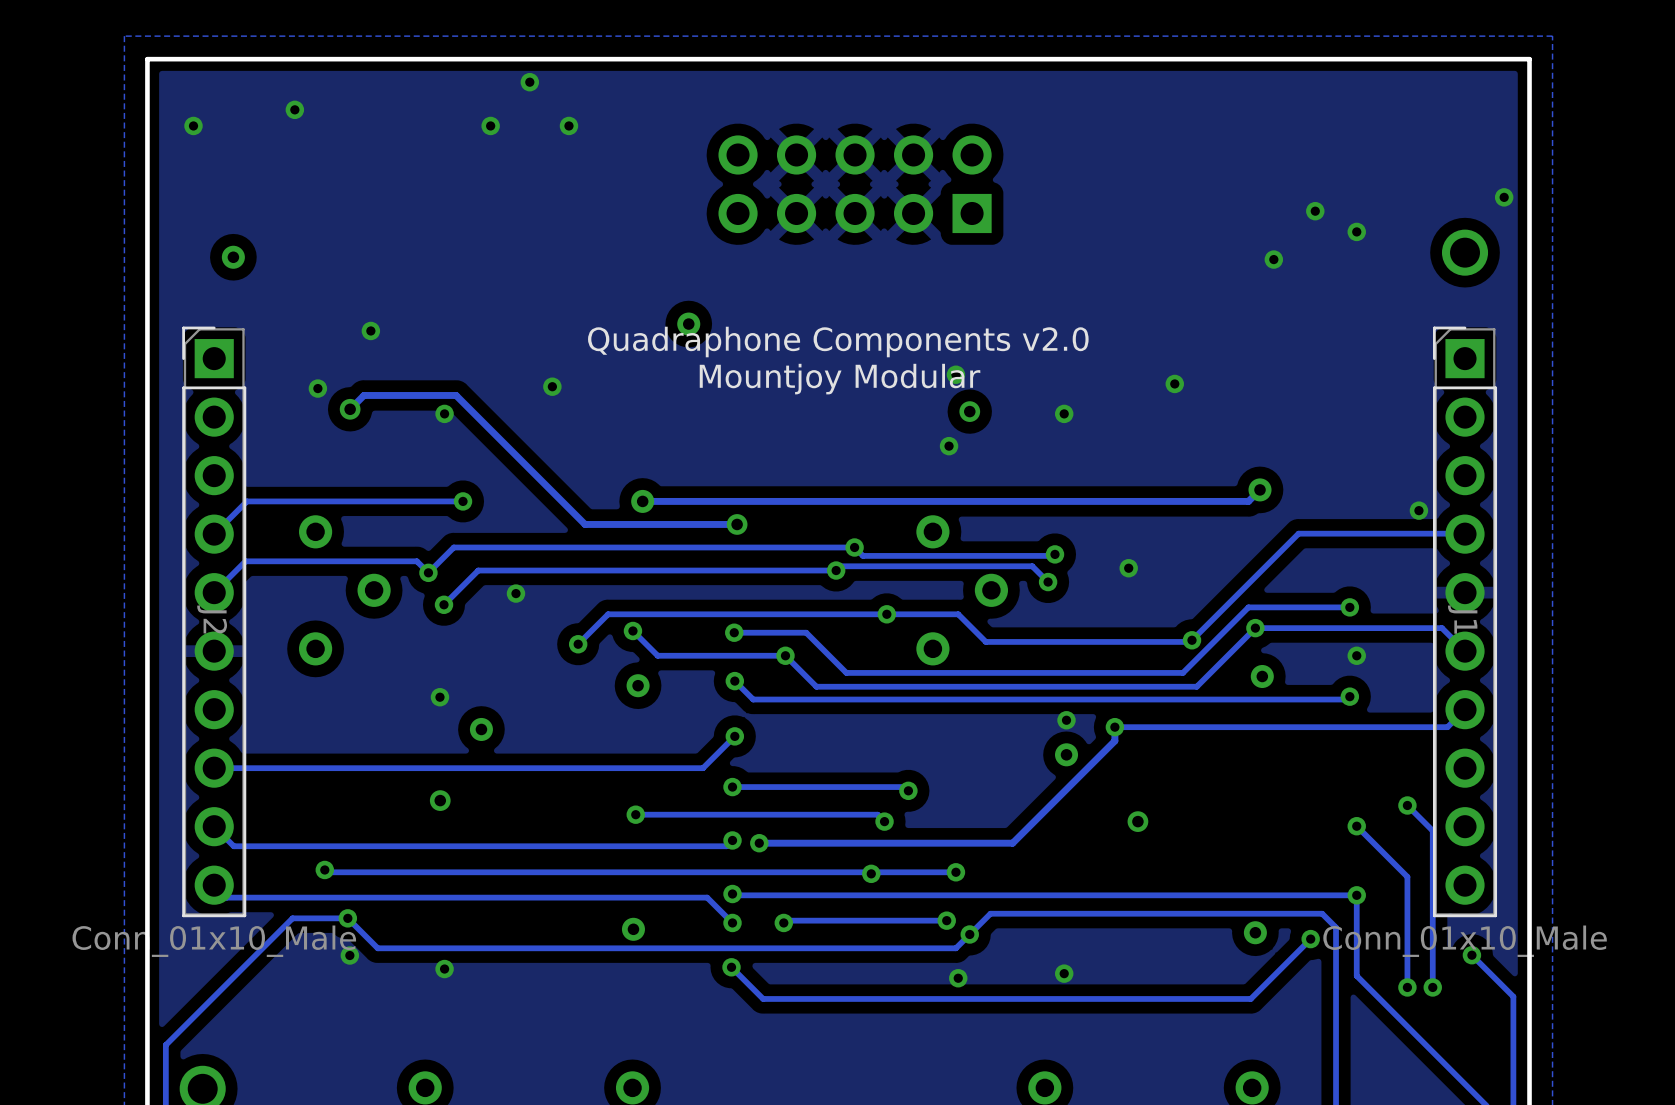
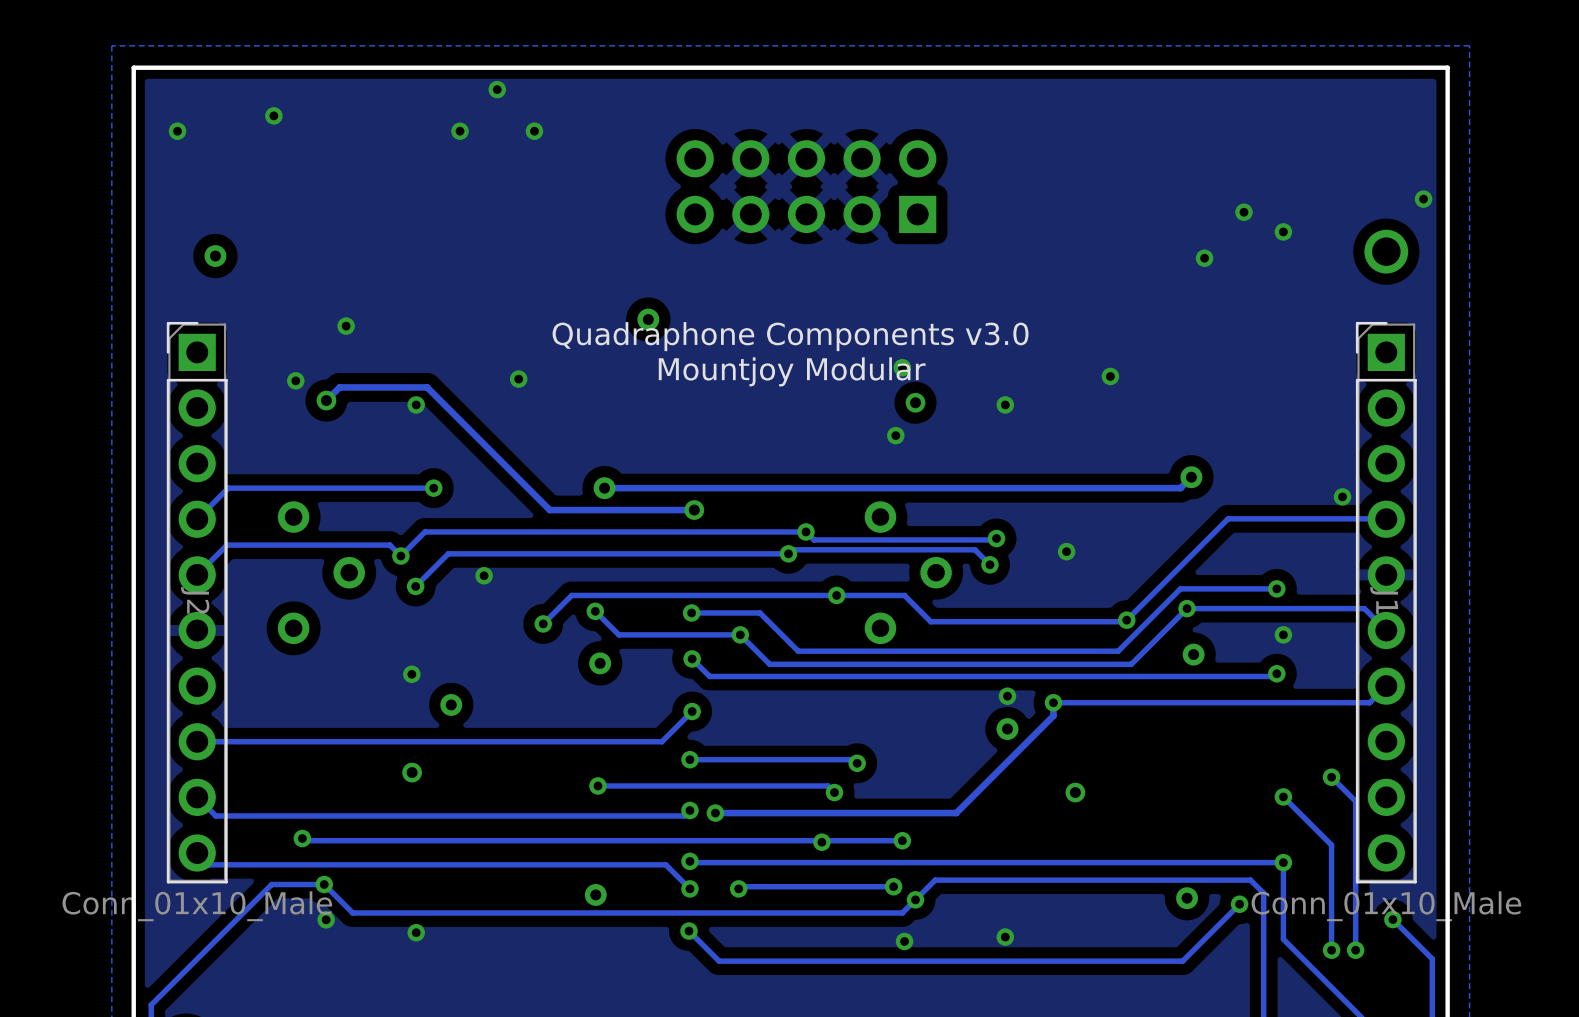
text: Quadraphone Components v2.0 (838, 342) -> Quadraphone Components v3.0 (790, 336)

